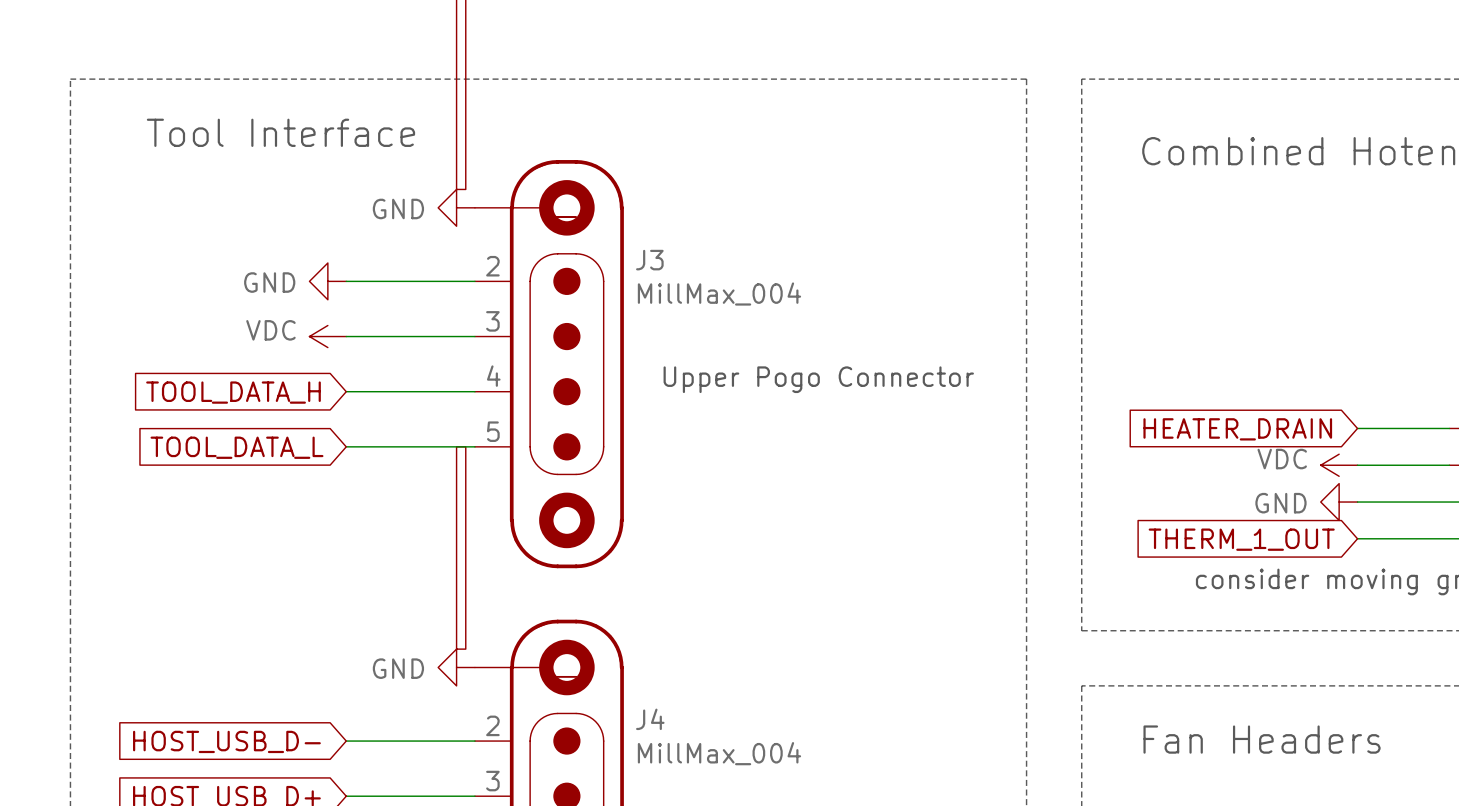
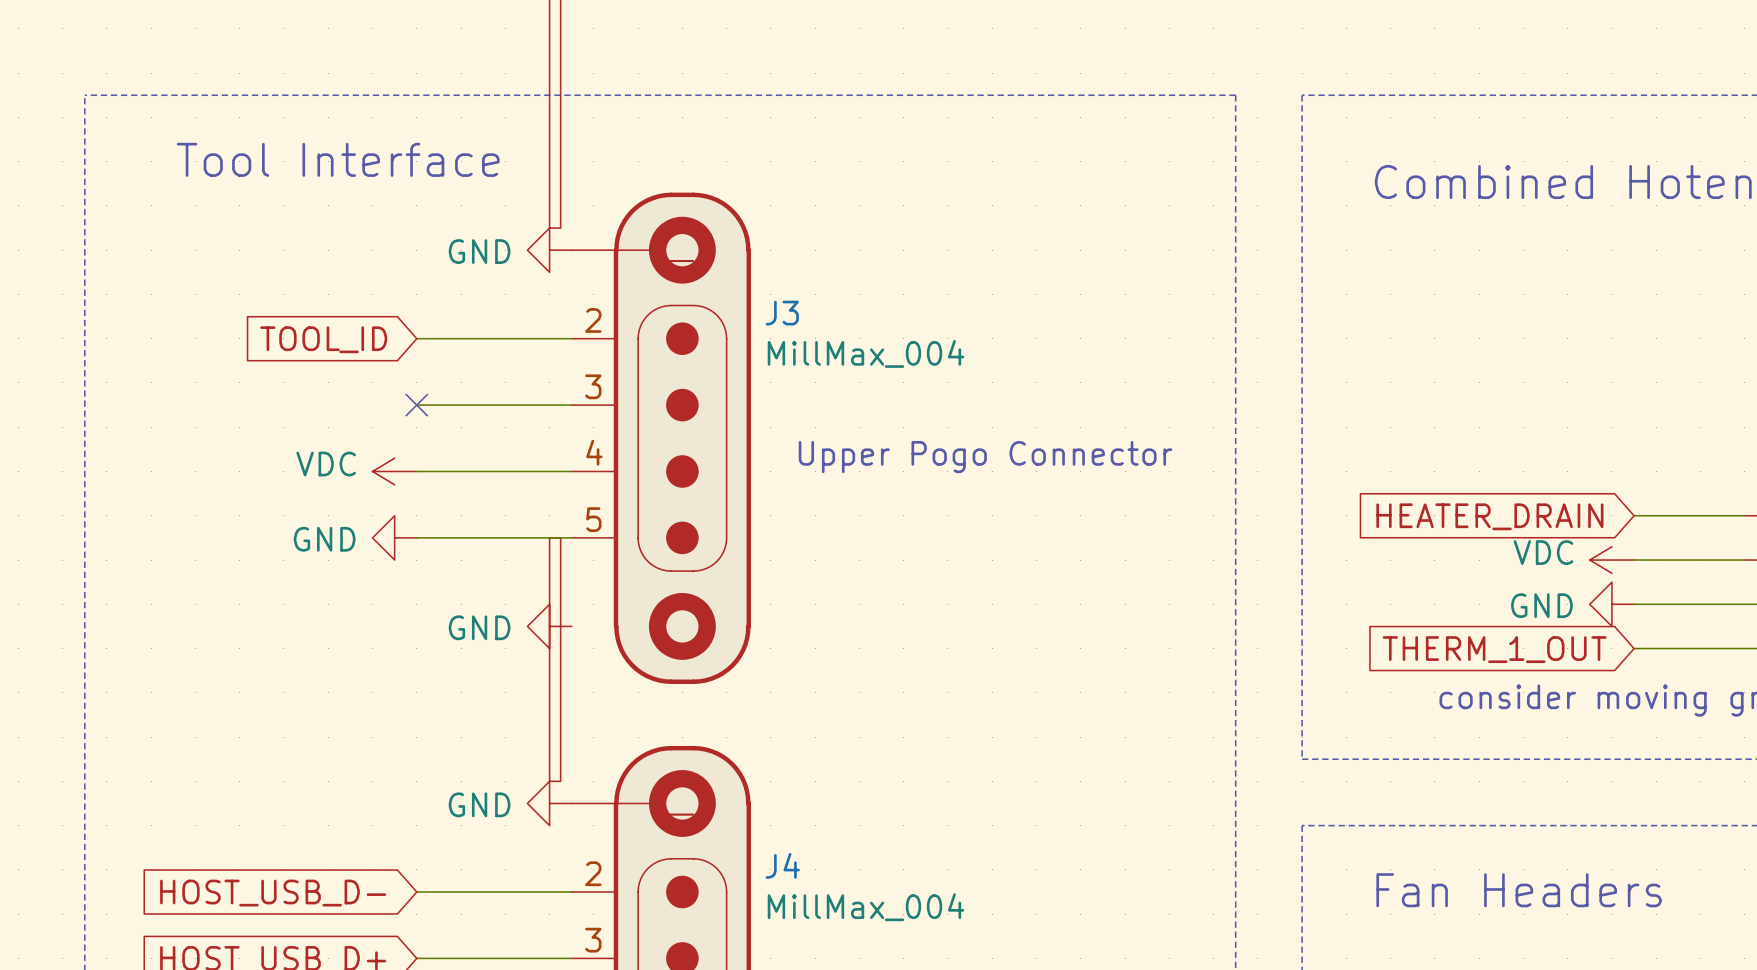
power symbol: GND (327, 281) -> none
global label: none -> TOOL_ID (323, 339)
power symbol position: VDC (327, 336) -> VDC (394, 471)
no-connect mark: none -> (416, 405)
global label: TOOL_DATA_H (233, 392) -> none
power symbol: none -> GND (394, 537)
global label: TOOL_DATA_L (237, 447) -> none
power symbol: none -> GND (549, 626)

